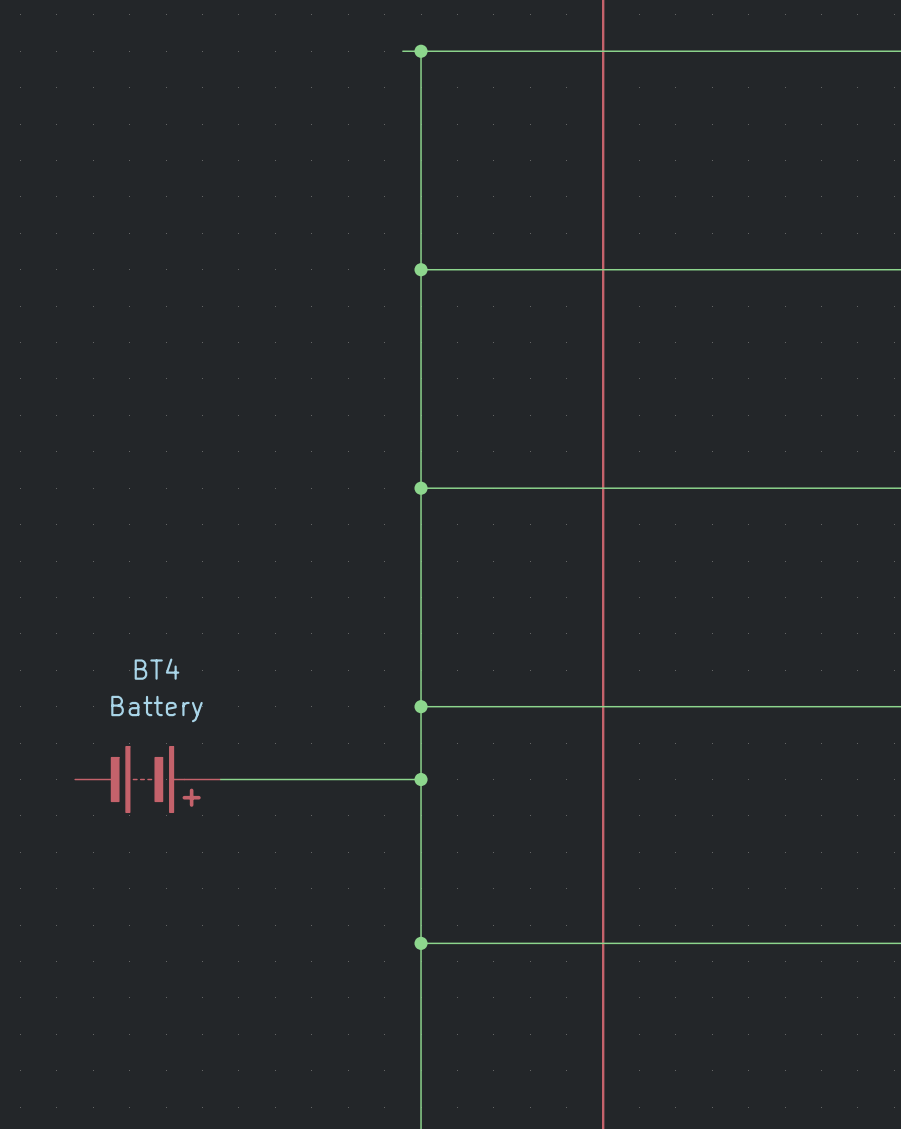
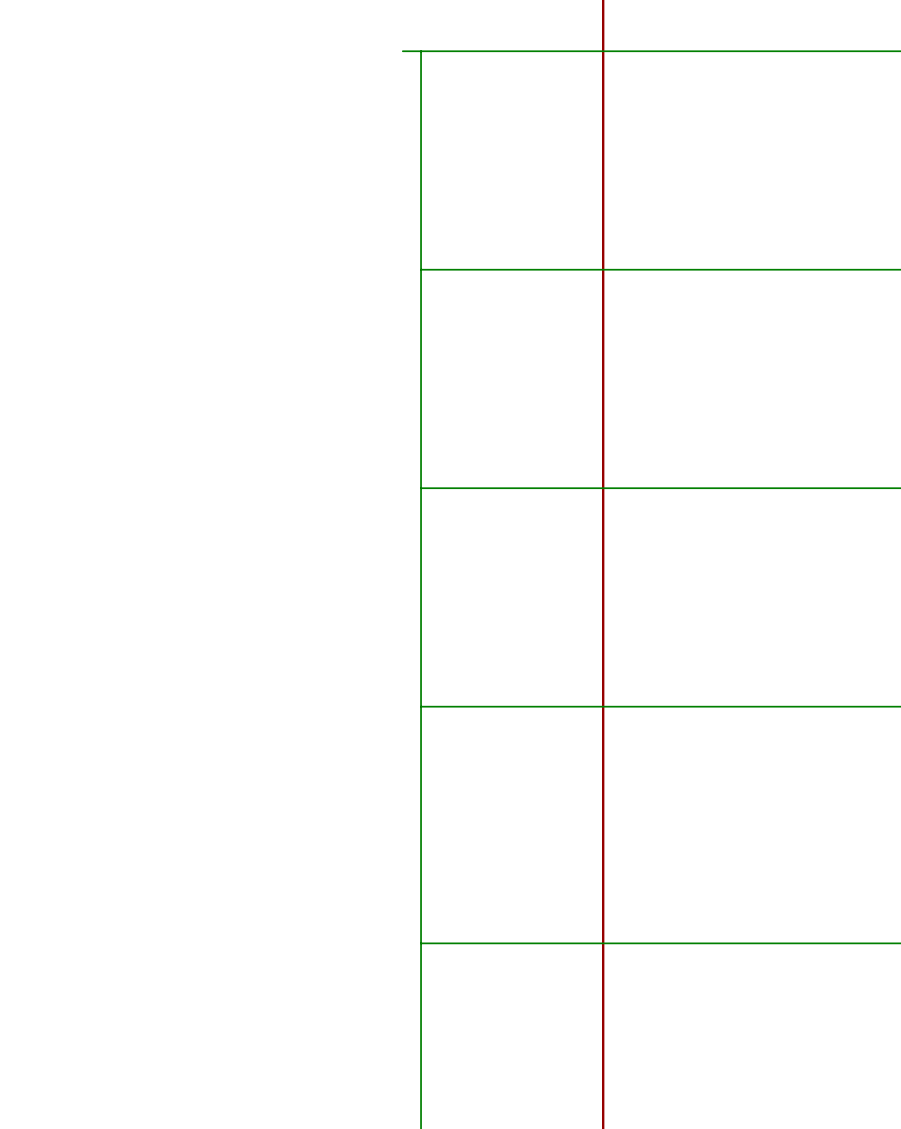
junction: (421, 51) -> none
junction: (421, 269) -> none
junction: (421, 488) -> none
junction: (421, 706) -> none
BT4: Battery (147, 779) -> none
wire: (220, 779) (421, 779) -> none
junction: (421, 779) -> none
junction: (421, 943) -> none

